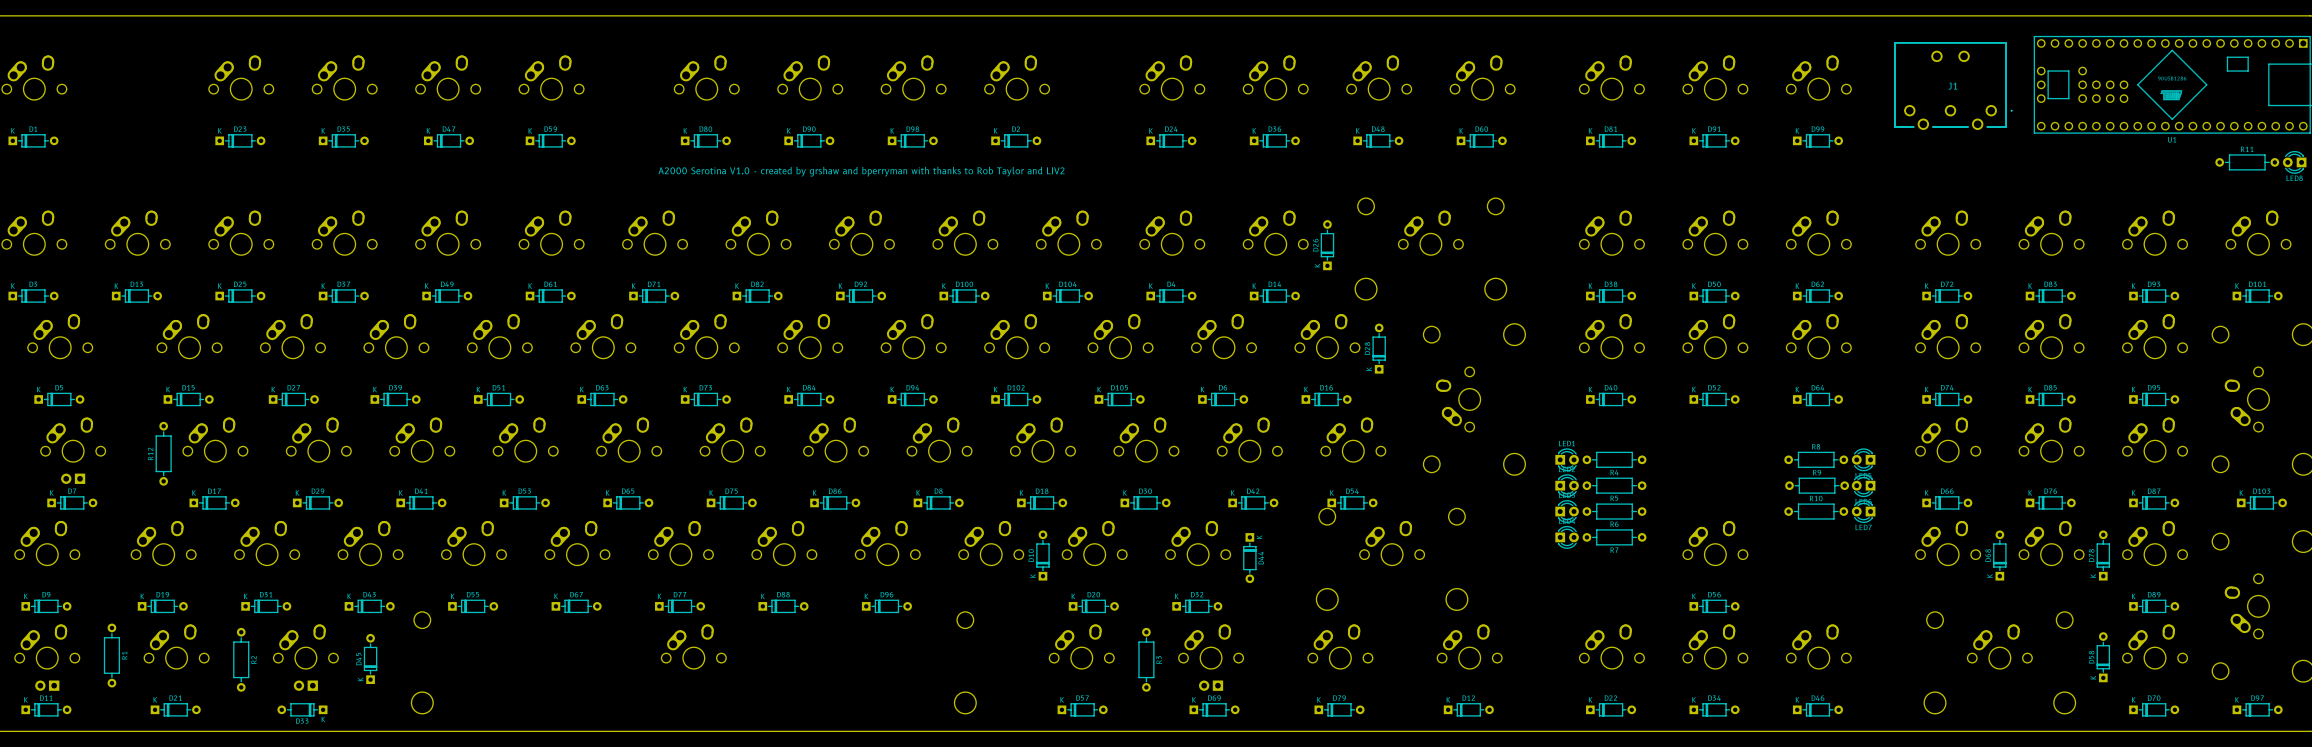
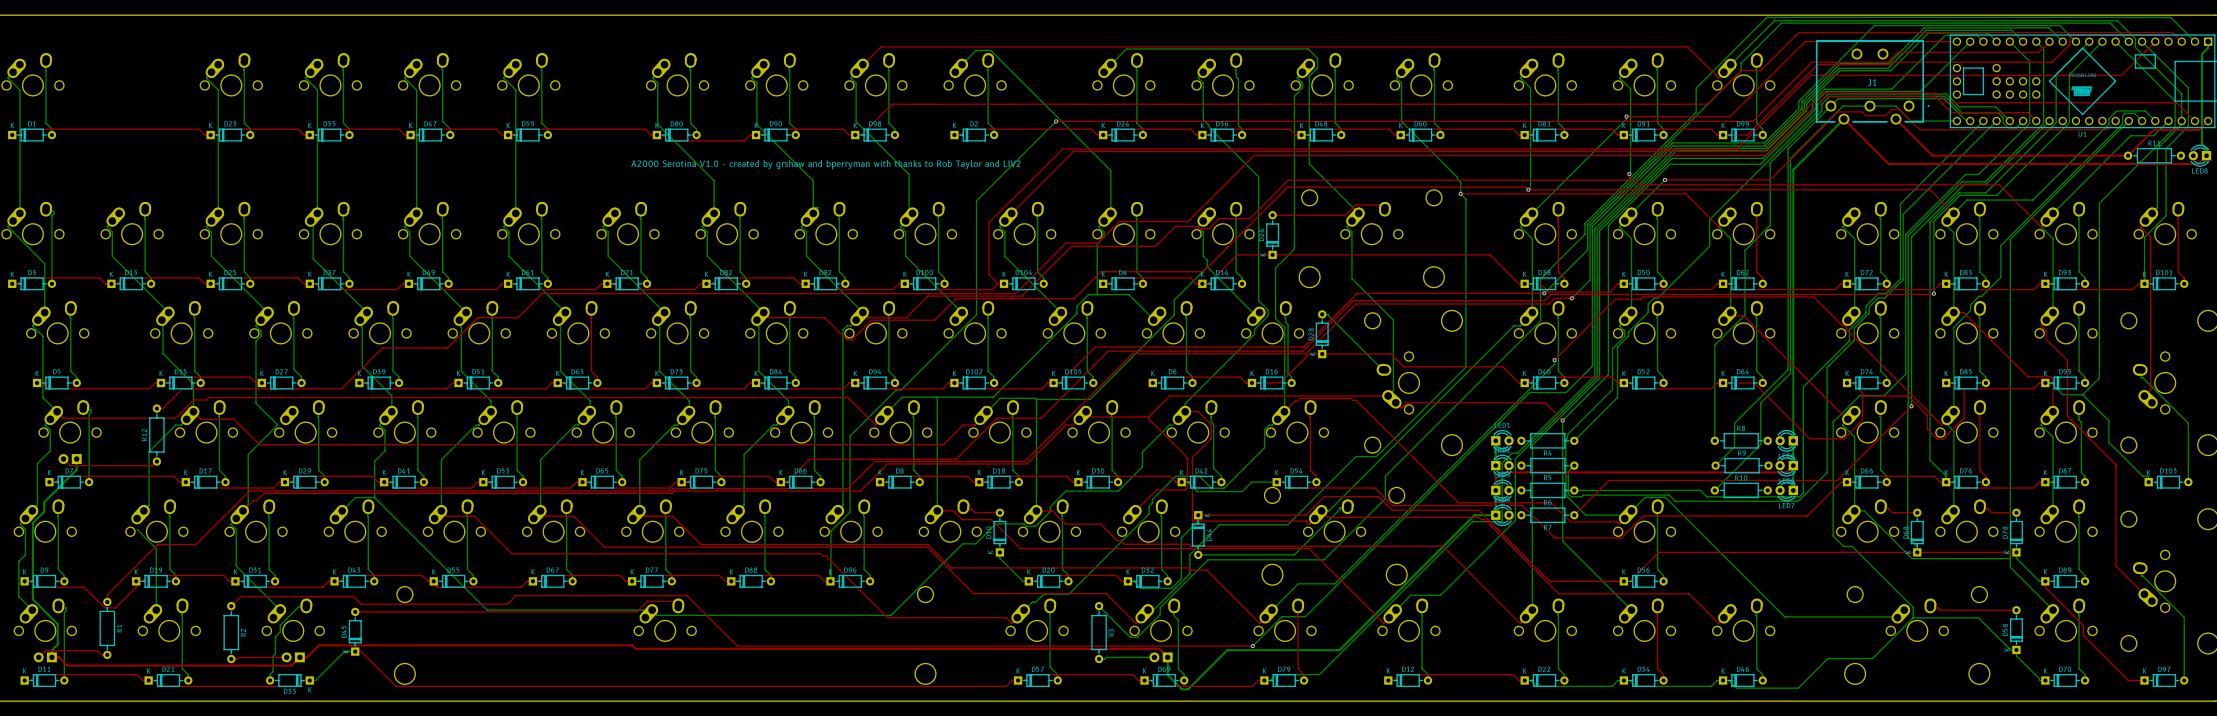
top track: none -> (1956, 41) (1805, 41) (1730, 116) (1626, 116)
bottom track: none -> (1970, 41) (1920, 91) (1826, 91) (1815, 102) (1815, 109) (1760, 164) (1669, 164) (1608, 225) (1608, 374) (1562, 420) (1562, 541) (1631, 610) (1624, 617)
bottom track: none -> (1983, 41) (1977, 35) (1945, 35) (1891, 89) (1824, 89) (1812, 101) (1812, 108) (1762, 158) (1672, 158) (1599, 230) (1599, 378) (1532, 445) (1532, 610) (1525, 617)
bottom track: none -> (1996, 41) (1987, 33) (1928, 33) (1890, 70) (1839, 70) (1806, 103) (1806, 110) (1766, 150) (1676, 150) (1597, 229) (1597, 377) (1515, 458) (1515, 520) (1440, 595) (1410, 595) (1389, 617)
bottom track: none -> (2009, 41) (2029, 61) (2029, 123) (1978, 174) (1965, 174) (1905, 234) (1905, 374) (1884, 395) (1859, 395) (1833, 422) (1833, 535) (1843, 546) (1852, 546) (1913, 607) (1913, 617)
bottom track: none -> (2023, 41) (2011, 30) (1926, 30) (1888, 68) (1838, 68) (1804, 102) (1804, 109) (1765, 148) (1675, 148) (1594, 228) (1594, 376) (1517, 453) (1511, 453) (1502, 462) (1502, 521) (1472, 521) (1319, 674) (1276, 674) (1270, 680) (1264, 680)
bottom track: none -> (2036, 41) (2043, 48) (2043, 123) (1985, 181) (1961, 181) (1908, 235) (1907, 536) (1917, 546) (1917, 552)
top track: none -> (2049, 41) (2038, 52) (1897, 52) (1887, 62) (1812, 62) (1752, 121) (1056, 121)
bottom track: none -> (2062, 41) (2048, 27) (1924, 27) (1888, 63) (1840, 63) (1801, 101) (1801, 108) (1764, 146) (1672, 146) (1592, 226) (1592, 366) (1566, 392) (1529, 392) (1305, 616) (1282, 616) (1252, 646)
bottom track: none -> (2075, 41) (2059, 25) (1874, 25) (1798, 101) (1798, 108) (1764, 142) (1672, 142) (1590, 225) (1590, 280) (1571, 298)
bottom track: none -> (2089, 41) (2056, 74) (2056, 122) (1985, 192) (1959, 192) (1930, 221) (1930, 460) (1946, 476) (1946, 482)
bottom track: none -> (2102, 41) (2069, 74) (2069, 122) (1996, 195) (1960, 195) (1933, 221) (1933, 293)
bottom track: none -> (2115, 41) (2175, 101) (2175, 127) (2099, 203) (2099, 378) (2082, 394)
bottom track: none -> (2128, 41) (2110, 23) (1781, 23) (1741, 63) (1741, 71) (1587, 224) (1587, 249) (1544, 293)
bottom track: none -> (2142, 41) (2188, 87) (2188, 126) (2166, 148) (2166, 215) (2144, 237) (2144, 283)
top track: none -> (2155, 41) (2121, 75) (1810, 75) (1737, 149) (1062, 149) (989, 222) (989, 274) (998, 283) (992, 289) (916, 289) (910, 283) (898, 283) (893, 289) (817, 289) (811, 283) (799, 283) (793, 277) (718, 277) (712, 283) (700, 283) (694, 289) (619, 289) (613, 283) (601, 283) (595, 289) (519, 289) (514, 283) (502, 283) (496, 289) (420, 289) (414, 283) (403, 283) (397, 289) (321, 289) (315, 283) (303, 283) (298, 277) (222, 277) (216, 283) (204, 283) (198, 277) (123, 277) (117, 283) (105, 283) (99, 277) (24, 277) (18, 283) (12, 283)
top track: none -> (2168, 41) (2161, 34) (2070, 34) (2069, 44) (2052, 62) (1892, 62) (1889, 64) (1817, 64) (1747, 135) (1717, 135) (1711, 129) (1635, 129) (1629, 135) (1618, 135) (1612, 129) (1536, 129) (1530, 135) (1518, 135) (1512, 129) (1412, 129) (1406, 135) (1394, 135) (1388, 129) (1313, 129) (1307, 135) (1295, 135) (1289, 129) (1214, 129) (1208, 135) (1196, 135) (1190, 129) (1114, 129) (1109, 135) (1097, 135) (1091, 129) (966, 129) (960, 135) (954, 135)
top track: none -> (2181, 41) (2172, 32) (1798, 32) (1760, 70) (1741, 70) (1707, 104) (891, 104) (861, 135) (849, 135) (843, 129) (767, 129) (761, 135) (750, 135) (744, 140) (668, 140) (662, 135) (651, 135) (645, 129) (519, 129) (514, 135) (502, 135) (496, 129) (422, 129) (416, 135) (404, 135) (398, 129) (321, 129) (315, 135) (303, 135) (298, 129) (222, 129) (216, 135) (204, 135) (198, 129) (24, 129) (18, 135) (12, 135)
bottom track: none -> (2194, 41) (2170, 17) (1766, 17) (1696, 88) (1696, 112) (1584, 223) (1584, 234) (1540, 278) (1540, 321) (1385, 476) (1385, 498) (1324, 559) (1208, 559) (1160, 607) (1160, 614) (1137, 637) (1130, 637) (1099, 606)
bottom track: none -> (2208, 41) (2208, 47) (2201, 54) (2201, 144) (2206, 148) (2206, 155)
bottom track: none -> (46, 59) (45, 123) (51, 129) (51, 135)
bottom track: none -> (244, 59) (244, 123) (250, 129) (250, 135)
bottom track: none -> (343, 59) (343, 123) (349, 129) (349, 135)
bottom track: none -> (442, 59) (442, 121) (450, 129) (450, 135)
bottom track: none -> (542, 59) (541, 123) (547, 129) (547, 135)
bottom track: none -> (690, 59) (690, 123) (696, 129) (696, 135)
bottom track: none -> (789, 59) (789, 123) (795, 129) (795, 135)
bottom track: none -> (889, 59) (888, 123) (894, 129) (894, 135)
bottom track: none -> (988, 59) (988, 123) (994, 129) (994, 135)
bottom track: none -> (1137, 59) (1136, 123) (1142, 129) (1142, 135)
bottom track: none -> (1236, 59) (1235, 69) (1238, 78) (1238, 125) (1242, 129) (1242, 135)
bottom track: none -> (1335, 59) (1335, 123) (1341, 129) (1341, 135)
bottom track: none -> (1434, 59) (1434, 123) (1440, 129) (1440, 135)
bottom track: none -> (1558, 59) (1558, 123) (1564, 129) (1564, 135)
bottom track: none -> (1657, 59) (1657, 123) (1663, 129) (1663, 135)
bottom track: none -> (1756, 59) (1756, 123) (1762, 129) (1762, 135)
bottom track: none -> (19, 64) (7, 77) (19, 89) (19, 213)
bottom track: none -> (218, 64) (206, 77) (218, 89) (218, 213)
bottom track: none -> (317, 64) (305, 77) (317, 89) (317, 216) (313, 220)
bottom track: none -> (416, 64) (404, 77) (416, 89) (416, 213)
bottom track: none -> (515, 64) (503, 77) (515, 89) (515, 213)
bottom track: none -> (1210, 64) (1198, 77) (1203, 83) (1203, 119) (1258, 176) (1258, 300) (1267, 310) (1267, 316) (1254, 329) (1254, 334) (1185, 403) (1185, 411)
bottom track: none -> (1309, 64) (1297, 77) (1302, 83) (1302, 88) (1294, 96) (1294, 249) (1275, 268) (1275, 318) (1284, 327) (1284, 411)
bottom track: none -> (1408, 64) (1396, 77) (1401, 83) (1401, 121) (1457, 177) (1460, 182) (1460, 193) (1465, 199) (1465, 367) (1376, 456) (1356, 456) (1287, 524) (1219, 524) (1189, 554) (1189, 573) (1153, 610) (1148, 610) (1141, 617)
bottom track: none -> (1631, 64) (1619, 77) (1630, 89) (1629, 174)
bottom track: none -> (657, 72) (652, 77) (657, 83) (657, 124) (714, 180) (714, 213) (702, 226) (707, 231) (707, 256) (763, 312) (754, 322) (758, 327) (758, 371) (788, 400) (788, 412) (744, 454) (744, 505)
bottom track: none -> (756, 72) (751, 77) (756, 83) (756, 124) (813, 180) (813, 213)
bottom track: none -> (856, 72) (850, 77) (856, 83) (856, 121) (909, 174) (909, 213)
top track: none -> (856, 72) (881, 46) (1687, 46) (1718, 77) (1723, 72)
bottom track: none -> (955, 72) (976, 50) (990, 50) (1110, 170) (1110, 213)
bottom track: none -> (1104, 72) (1126, 48) (1308, 48) (1317, 58) (1317, 67) (1309, 76) (1309, 163) (1358, 213)
bottom track: none -> (1525, 72) (1520, 77) (1530, 88) (1530, 187) (1528, 189)
bottom track: none -> (1723, 72) (1774, 20) (2117, 20) (2135, 38) (2135, 47) (2181, 93) (2181, 124) (2157, 148) (2157, 207)
bottom track: none -> (1626, 116) (1626, 119) (1520, 226) (1532, 238) (1532, 313) (1520, 325) (1513, 325) (1328, 510) (1321, 510)
via: none -> (1626, 116)
bottom track: none -> (1843, 119) (1793, 169) (1793, 490)
top track: none -> (1843, 119) (1888, 163) (2198, 163) (2206, 155)
top track: none -> (1896, 119) (1932, 155) (2128, 155) (2153, 129) (2199, 129) (2208, 120)
bottom track: none -> (1056, 121) (976, 200) (976, 314) (901, 389) (896, 389) (850, 436) (850, 512) (830, 531) (830, 581)
via: none -> (1056, 121)
bottom track: none -> (1956, 120) (1910, 120) (1896, 106) (1842, 106) (1790, 158) (1790, 373) (1760, 403) (1760, 444) (1714, 490)
bottom track: none -> (1970, 120) (1966, 120) (1944, 98) (1838, 98) (1788, 148) (1788, 369) (1734, 423) (1734, 446) (1715, 465)
bottom track: none -> (1983, 120) (1900, 203) (1900, 279) (1886, 293) (1878, 293) (1865, 306) (1865, 313) (1849, 329) (1849, 340) (1803, 386) (1803, 492) (1799, 496) (1706, 496) (1700, 490) (1574, 490)
bottom track: none -> (1996, 120) (1903, 214) (1903, 279) (1884, 297) (1878, 297) (1869, 306) (1869, 313) (1854, 328) (1854, 340) (1827, 367) (1827, 472) (1798, 501) (1675, 501) (1669, 495) (1571, 496) (1568, 493) (1568, 471) (1574, 465)
bottom track: none -> (2009, 120) (1995, 106) (1958, 106) (1946, 93) (1828, 93) (1817, 104) (1817, 111) (1709, 219) (1709, 246) (1658, 297) (1654, 297) (1648, 303) (1648, 312) (1628, 332) (1628, 335) (1617, 346) (1617, 397) (1574, 440)
bottom track: none -> (2023, 120) (2016, 127) (2008, 127) (1998, 112) (1961, 112) (1945, 96) (1829, 96) (1821, 104) (1821, 111) (1770, 162) (1770, 225) (1744, 250) (1744, 315) (1714, 345) (1714, 440)
top track: none -> (2036, 120) (2027, 112) (1951, 112) (1935, 96) (1825, 96) (1766, 155) (1254, 155) (1187, 221) (1119, 221) (1097, 243) (1066, 243) (1015, 293) (542, 293) (518, 317) (477, 317) (447, 348) (382, 348) (341, 388) (182, 388) (162, 408) (156, 408)
bottom track: none -> (2049, 120) (1986, 184) (1964, 184) (1911, 237) (1911, 406)
top track: none -> (2115, 120) (2106, 129) (1919, 129) (1899, 109) (1891, 109) (1885, 115) (1865, 115) (1862, 111) (1838, 111) (1770, 179) (1665, 179)
bottom track: none -> (2128, 120) (2010, 239) (2010, 567) (2053, 610) (2046, 617)
bottom track: none -> (2142, 120) (2134, 113) (2124, 113) (2122, 115) (2122, 123) (2000, 245) (2000, 277) (1970, 304) (1970, 310) (1953, 327) (1953, 411) (1944, 421) (1953, 431) (1953, 511) (1947, 518)
bottom track: none -> (2155, 120) (2145, 110) (2116, 110) (2109, 118) (2109, 123) (2032, 200) (1967, 200) (1944, 223) (1953, 232) (1953, 313) (1947, 320)
bottom track: none -> (2168, 120) (2153, 135) (2130, 135) (2041, 226) (2053, 238) (2053, 313) (2046, 320)
top track: none -> (2194, 120) (2176, 102) (1947, 102) (1937, 93) (1822, 93) (1764, 151) (1073, 151) (1004, 220)
top track: none -> (1629, 174) (1629, 180)
via: none -> (1629, 174)
bottom track: none -> (1665, 179) (1619, 226) (1631, 238) (1631, 312)
via: none -> (1665, 179)
via: none -> (1528, 189)
top track: none -> (1460, 193) (1685, 193) (1718, 226) (1723, 220)
via: none -> (1460, 193)
bottom track: none -> (46, 207) (45, 210) (53, 211) (51, 215) (51, 283)
bottom track: none -> (145, 207) (145, 271) (151, 277) (151, 283)
bottom track: none -> (244, 207) (244, 271) (250, 277) (250, 283)
bottom track: none -> (343, 207) (343, 271) (349, 277) (349, 283)
bottom track: none -> (442, 207) (442, 271) (448, 277) (448, 283)
bottom track: none -> (542, 207) (541, 271) (547, 277) (547, 283)
bottom track: none -> (641, 207) (641, 271) (646, 277) (646, 283)
bottom track: none -> (740, 207) (740, 271) (746, 277) (746, 283)
bottom track: none -> (813, 207) (818, 207) (801, 226) (806, 231) (806, 256) (862, 312) (850, 325) (846, 325) (842, 329) (843, 505)
bottom track: none -> (839, 207) (839, 271) (845, 277) (845, 283)
bottom track: none -> (938, 207) (938, 271) (944, 277) (944, 283)
bottom track: none -> (1037, 207) (1037, 271) (1043, 277) (1043, 283)
bottom track: none -> (1137, 207) (1136, 271) (1142, 277) (1142, 283)
bottom track: none -> (1236, 207) (1236, 271) (1242, 277) (1242, 283)
bottom track: none -> (1657, 207) (1657, 271) (1663, 277) (1663, 283)
top track: none -> (1756, 207) (1756, 271) (1762, 277) (1762, 283)
bottom track: none -> (1880, 207) (1880, 271) (1886, 277) (1886, 283)
bottom track: none -> (1980, 207) (1979, 271) (1985, 277) (1985, 283)
bottom track: none -> (2079, 207) (2079, 271) (2085, 277) (2085, 283)
top track: none -> (2178, 207) (2178, 271) (2184, 277) (2184, 283)
top track: none -> (1384, 210) (1382, 204) (1355, 204) (1345, 215) (1272, 215)
top track: none -> (1558, 210) (1558, 271) (1564, 277) (1564, 283)
bottom track: none -> (614, 213) (602, 226) (608, 231) (608, 256) (664, 312) (655, 322) (659, 327) (659, 371) (689, 400) (689, 411) (677, 425)
bottom track: none -> (909, 213) (900, 226) (905, 231) (905, 256) (962, 312) (955, 320)
bottom track: none -> (1730, 213) (1718, 226) (1730, 238) (1730, 312)
bottom track: none -> (1854, 213) (1842, 226) (1854, 238) (1854, 312)
top track: none -> (1953, 213) (1930, 189) (1528, 189) (1525, 187) (1287, 187) (1203, 271) (1101, 271) (1074, 298) (956, 298) (934, 320) (871, 320) (852, 339) (846, 339) (824, 317) (768, 317) (763, 312)
bottom track: none -> (13, 220) (7, 226) (44, 263) (44, 313) (32, 325) (42, 336) (42, 397) (57, 412) (45, 425) (50, 430) (50, 450) (37, 463) (37, 505)
bottom track: none -> (112, 220) (107, 226) (112, 231) (112, 256) (168, 312) (163, 320)
bottom track: none -> (211, 220) (206, 226) (211, 231) (211, 256) (267, 312) (255, 325) (261, 331) (261, 336) (255, 341) (255, 403) (277, 425) (248, 454) (248, 505)
bottom track: none -> (313, 220) (313, 258) (367, 312) (357, 322) (362, 327) (362, 366) (391, 395) (391, 412) (379, 425) (385, 430) (385, 450) (374, 461) (374, 497)
bottom track: none -> (409, 220) (404, 226) (409, 231) (409, 256) (466, 312) (457, 322) (461, 327) (461, 371) (491, 400) (491, 412) (479, 425)
bottom track: none -> (508, 220) (503, 226) (508, 231) (508, 256) (565, 312) (556, 322) (560, 327) (560, 371) (590, 400) (590, 412) (578, 425)
bottom track: none -> (1004, 220) (999, 226) (1004, 231) (1004, 256) (1061, 312) (1054, 320)
bottom track: none -> (1104, 220) (1098, 226) (1104, 231) (1104, 236) (1097, 243) (1097, 294)
bottom track: none -> (1203, 220) (1198, 226) (1203, 231) (1203, 256) (1207, 260) (1207, 267)
bottom track: none -> (1351, 220) (1346, 226) (1351, 231) (1351, 278) (1393, 320) (1393, 390) (1388, 395)
top track: none -> (2046, 220) (2041, 226) (1999, 184) (1640, 184) (1635, 180) (1288, 180) (1249, 218) (1219, 218) (1209, 228) (1175, 226) (1155, 246) (1071, 246) (1021, 296) (928, 296) (906, 317) (868, 317) (862, 312)
top track: none -> (2145, 220) (2140, 226) (2150, 237) (2150, 389) (2144, 395)
bottom track: none -> (1207, 267) (1252, 312)
bottom track: none -> (1207, 267) (1174, 300) (1174, 314) (1089, 399) (1036, 399)
top track: none -> (1103, 283) (1109, 283) (1114, 277) (1190, 277) (1196, 283) (1208, 283) (1237, 254) (1489, 254) (1518, 283) (1540, 283) (1548, 292) (1609, 292) (1618, 283) (1629, 283) (1635, 289) (1711, 289) (1717, 283) (1728, 283) (1734, 289) (1835, 289) (1841, 283) (1852, 283) (1858, 289) (1934, 289) (1940, 283) (1952, 283) (1957, 289) (2033, 289) (2039, 283) (2051, 283) (2057, 289) (2132, 289) (2138, 283) (2144, 283)
top track: none -> (1544, 293) (1357, 293) (1303, 346) (1095, 346) (1059, 382) (1047, 382) (1041, 388) (966, 388) (960, 382) (948, 382) (942, 388) (867, 388) (861, 382) (849, 382) (843, 388) (767, 388) (761, 382) (750, 382) (744, 388) (668, 388) (662, 382) (651, 382) (645, 388) (569, 388) (563, 382) (551, 382) (545, 388) (470, 388) (464, 382) (452, 382) (446, 388) (371, 388) (365, 382) (359, 382)
via: none -> (1544, 293)
top track: none -> (1933, 293) (1550, 294) (1544, 300) (1353, 300) (1302, 351) (1108, 351) (1041, 418) (997, 418) (956, 459) (809, 459) (786, 482) (775, 482) (769, 476) (693, 476) (687, 482) (675, 482) (669, 488) (594, 488) (588, 482) (576, 482) (570, 488) (495, 488) (489, 482) (477, 482) (471, 488) (395, 488) (390, 482) (378, 482) (372, 476) (296, 476) (290, 482) (279, 482) (273, 488) (197, 488) (191, 482) (179, 482) (174, 476) (61, 476) (55, 482) (49, 482)
via: none -> (1933, 293)
top track: none -> (1571, 298) (1554, 298) (1549, 303) (1355, 303) (1306, 353) (1132, 353) (1024, 461) (874, 461) (847, 488) (672, 488) (670, 490) (249, 490) (195, 544) (157, 544) (107, 595) (107, 601)
via: none -> (1571, 298)
bottom track: none -> (70, 306) (70, 371) (76, 377) (76, 382)
bottom track: none -> (194, 306) (194, 371) (200, 377) (200, 382)
bottom track: none -> (294, 306) (293, 369) (301, 377) (301, 382)
bottom track: none -> (393, 306) (393, 371) (399, 377) (399, 382)
bottom track: none -> (492, 306) (492, 371) (498, 377) (498, 382)
top track: none -> (591, 306) (591, 371) (597, 377) (597, 382)
bottom track: none -> (690, 306) (690, 371) (696, 377) (696, 382)
bottom track: none -> (789, 306) (789, 371) (795, 377) (795, 382)
bottom track: none -> (889, 306) (888, 371) (894, 377) (894, 382)
bottom track: none -> (988, 306) (988, 371) (994, 377) (994, 382)
bottom track: none -> (1087, 306) (1087, 371) (1093, 377) (1093, 382)
bottom track: none -> (1285, 306) (1285, 322) (1288, 324) (1288, 373) (1291, 377) (1291, 382)
bottom track: none -> (1558, 306) (1558, 371) (1564, 377) (1564, 382)
bottom track: none -> (1657, 306) (1657, 371) (1663, 377) (1663, 382)
bottom track: none -> (1756, 306) (1756, 371) (1762, 377) (1762, 382)
bottom track: none -> (1880, 306) (1880, 371) (1886, 377) (1886, 382)
bottom track: none -> (1980, 306) (1979, 371) (1985, 377) (1985, 382)
bottom track: none -> (2079, 306) (2079, 371) (2085, 377) (2085, 382)
bottom track: none -> (1186, 309) (1186, 371) (1192, 377) (1192, 382)
top track: none -> (1953, 312) (1963, 312) (2027, 376) (2050, 376) (2053, 378) (2053, 411)
bottom track: none -> (1322, 314) (1328, 314) (1382, 369)
bottom track: none -> (163, 320) (163, 353) (193, 384) (193, 411) (181, 425) (175, 425) (149, 451) (149, 505) (143, 510)
bottom track: none -> (1153, 319) (1128, 294) (1088, 294) (1076, 306) (1076, 313) (993, 397) (902, 397) (880, 419)
bottom track: none -> (1624, 320) (1619, 325) (1624, 331) (1624, 336) (1612, 348) (1612, 389) (1567, 434) (1565, 439) (1565, 495) (1585, 515) (1627, 515) (1644, 497) (1665, 497) (1784, 616) (1897, 616)
top track: none -> (1723, 320) (1728, 315) (1743, 315) (1847, 418)
top track: none -> (2046, 320) (2041, 325) (2046, 331) (2046, 339) (2067, 360) (2067, 416) (2116, 464) (2116, 565) (2138, 589)
top track: none -> (1843, 324) (1846, 329) (1941, 425) (1947, 419)
top track: none -> (1843, 324) (1842, 325) (1813, 296) (1643, 296) (1640, 299) (1615, 299) (1554, 360)
bottom track: none -> (1554, 360) (1554, 364) (1334, 583) (1298, 583) (1265, 617)
via: none -> (1554, 360)
bottom track: none -> (2141, 369) (2141, 377) (2188, 423) (2188, 482)
top track: none -> (37, 382) (42, 382) (48, 388) (149, 388) (155, 382) (166, 382) (172, 377) (250, 377) (255, 382) (261, 382)
top track: none -> (1152, 382) (1158, 382) (1164, 377) (1240, 377) (1246, 382) (1280, 382) (1309, 354) (1391, 354) (1403, 366) (1502, 366) (1518, 382) (1530, 382) (1536, 377) (1612, 377) (1618, 382) (1629, 382) (1635, 388) (1711, 388) (1717, 382) (1754, 382) (1809, 438) (1844, 438) (1862, 420) (1862, 392) (1852, 382) (1847, 382)
top track: none -> (1946, 382) (1952, 382) (1957, 388) (2033, 388) (2039, 382) (2045, 382)
bottom track: none -> (2045, 382) (2051, 382) (2062, 394) (2082, 394)
top track: none -> (1964, 388) (1964, 418) (1943, 439) (1937, 439) (1927, 429) (1927, 415) (1908, 396) (1862, 396)
bottom track: none -> (2082, 394) (2108, 420) (2108, 442) (2142, 476) (2148, 476) (2148, 482)
top track: none -> (1388, 395) (1169, 395) (1148, 417)
bottom track: none -> (937, 397) (937, 510)
bottom track: none -> (1036, 399) (1036, 510) (1029, 518)
bottom track: none -> (1036, 399) (1000, 398) (980, 419)
top track: none -> (1395, 402) (1401, 407) (1406, 402) (1545, 402) (1562, 420)
bottom track: none -> (83, 406) (83, 409) (91, 409) (89, 414) (89, 482)
bottom track: none -> (219, 406) (219, 470) (225, 476) (225, 482)
bottom track: none -> (318, 406) (318, 470) (324, 476) (324, 482)
bottom track: none -> (418, 406) (417, 470) (423, 476) (423, 482)
bottom track: none -> (517, 406) (517, 470) (523, 476) (523, 482)
bottom track: none -> (616, 406) (616, 470) (622, 476) (622, 482)
bottom track: none -> (715, 406) (715, 470) (721, 476) (721, 482)
bottom track: none -> (814, 406) (814, 470) (820, 476) (820, 482)
bottom track: none -> (913, 406) (913, 470) (919, 476) (919, 482)
bottom track: none -> (1013, 406) (1012, 470) (1018, 476) (1018, 482)
bottom track: none -> (1112, 406) (1112, 470) (1118, 476) (1118, 482)
bottom track: none -> (1211, 406) (1211, 422) (1213, 424) (1213, 468) (1221, 476) (1221, 482)
bottom track: none -> (1880, 406) (1880, 470) (1886, 476) (1886, 482)
top track: none -> (1911, 406) (1837, 480) (1609, 480) (1574, 515)
via: none -> (1911, 406)
bottom track: none -> (2079, 406) (2078, 416) (2081, 422) (2081, 472) (2085, 476) (2085, 482)
top track: none -> (1310, 409) (1310, 470) (1316, 476) (1316, 482)
top track: none -> (1979, 409) (1979, 470) (1985, 476) (1985, 482)
top track: none -> (57, 411) (63, 418) (175, 418) (193, 399) (206, 399) (208, 397) (848, 397) (875, 425) (880, 419)
top track: none -> (193, 411) (200, 419) (234, 419) (259, 444) (943, 444) (963, 425) (974, 425) (980, 419)
top track: none -> (1086, 411) (1091, 417) (1148, 417)
bottom track: none -> (2053, 411) (2041, 425) (2053, 437) (2053, 511) (2046, 518)
top track: none -> (1184, 412) (1198, 411) (1211, 424) (1211, 438) (1192, 457) (1192, 521) (1306, 521) (1309, 524) (1321, 511)
top track: none -> (1283, 412) (1300, 398) (1350, 398) (1356, 400) (1458, 502) (1551, 502) (1570, 522) (1617, 522) (1619, 524) (1624, 518)
top track: none -> (1148, 417) (1187, 457) (1187, 487) (1185, 490) (1156, 490) (1135, 510)
bottom track: none -> (1277, 419) (1264, 430) (1264, 447) (1224, 488) (1211, 488) (1199, 476) (1175, 476) (1152, 499) (1152, 502) (1149, 506) (1149, 514) (1068, 594) (1044, 594) (1035, 602) (1032, 602) (1017, 617)
bottom track: none -> (1847, 419) (1842, 425) (1854, 437) (1854, 510) (1864, 510) (1912, 558) (2010, 558)
via: none -> (1562, 420)
bottom track: none -> (479, 425) (476, 425) (441, 459) (441, 510)
bottom track: none -> (578, 425) (575, 425) (540, 459) (540, 510)
bottom track: none -> (677, 425) (674, 425) (639, 459) (639, 510)
top track: none -> (1074, 425) (1065, 425) (1027, 463) (887, 463) (860, 490) (674, 490) (672, 493) (263, 493) (243, 510)
bottom track: none -> (1173, 425) (1169, 425) (1142, 452) (1142, 466) (1118, 491) (1066, 491) (1050, 506) (1050, 511) (1035, 526) (1026, 526) (1024, 523) (995, 523) (975, 543) (962, 543) (891, 615) (656, 615) (652, 610)
bottom track: none -> (1495, 440) (1495, 465)
top track: none -> (63, 459) (70, 465) (152, 465) (156, 461)
bottom track: none -> (76, 459) (76, 469) (44, 502) (44, 511) (32, 523) (32, 599) (57, 624) (57, 644) (51, 650) (51, 657)
top track: none -> (1793, 465) (1786, 472) (1502, 472) (1495, 479) (1495, 490)
top track: none -> (880, 482) (885, 482) (891, 476) (967, 476) (973, 482) (985, 482) (990, 476) (1066, 476) (1072, 482) (1084, 482) (1090, 476) (1169, 476) (1175, 482) (1181, 482)
bottom track: none -> (1181, 482) (1187, 482) (1197, 491) (1242, 491) (1251, 482) (1276, 482)
top track: none -> (1276, 482) (1282, 482) (1288, 488) (1375, 488) (1392, 505) (1522, 505) (1555, 538) (1621, 538) (1643, 516) (1807, 516) (1841, 482) (1852, 482) (1858, 476) (1934, 476) (1940, 482) (1952, 482) (1957, 488) (2033, 488) (2039, 482) (2045, 482)
bottom track: none -> (1495, 490) (1495, 515) (1474, 515) (1339, 650) (1227, 650) (1188, 689) (1181, 689) (1167, 675) (1167, 657)
bottom track: none -> (374, 497) (355, 497) (335, 518)
bottom track: none -> (374, 497) (487, 610) (652, 610)
bottom track: none -> (37, 505) (20, 524) (25, 529) (25, 554) (18, 561) (18, 596) (32, 610) (25, 617)
bottom track: none -> (248, 505) (231, 524) (236, 529) (236, 566) (280, 610) (273, 617)
bottom track: none -> (58, 505) (58, 569) (64, 575) (64, 581)
bottom track: none -> (170, 505) (169, 569) (175, 575) (175, 581)
bottom track: none -> (368, 505) (368, 569) (374, 575) (374, 581)
bottom track: none -> (467, 505) (467, 569) (473, 575) (473, 581)
bottom track: none -> (566, 505) (566, 569) (572, 575) (572, 581)
bottom track: none -> (666, 505) (665, 569) (671, 575) (671, 581)
bottom track: none -> (765, 505) (764, 569) (770, 575) (770, 581)
bottom track: none -> (864, 505) (864, 569) (870, 575) (870, 581)
bottom track: none -> (1062, 505) (1062, 569) (1068, 575) (1068, 581)
bottom track: none -> (1161, 505) (1161, 569) (1167, 575) (1167, 581)
bottom track: none -> (1347, 505) (1347, 508) (1339, 507) (1294, 554) (1198, 554)
bottom track: none -> (1657, 505) (1657, 569) (1663, 575) (1663, 581)
bottom track: none -> (2079, 505) (2079, 569) (2085, 575) (2085, 581)
bottom track: none -> (269, 508) (269, 569) (275, 575) (275, 581)
top track: none -> (963, 508) (971, 508) (975, 512) (999, 512)
top track: none -> (1880, 508) (1888, 508) (1892, 512) (1917, 512)
top track: none -> (1979, 508) (1987, 508) (1991, 512) (2016, 512)
top track: none -> (1036, 510) (1052, 510) (1065, 524) (1100, 524) (1117, 540) (1120, 540) (1124, 544) (1189, 544) (1191, 546) (1443, 546) (1520, 623) (1525, 617)
top track: none -> (440, 511) (446, 516) (474, 516) (511, 553) (820, 553) (825, 555) (887, 617) (1006, 617) (1012, 623) (1017, 617)
top track: none -> (1321, 511) (1327, 517) (1479, 517) (1484, 519) (1558, 593) (1689, 593) (1718, 623) (1723, 617)
bottom track: none -> (1198, 515) (1198, 521) (1181, 537) (1181, 578) (1171, 588) (1140, 588) (1133, 581) (1128, 581)
top track: none -> (1198, 515) (1305, 515) (1324, 496) (1378, 496) (1392, 510) (1478, 510) (1549, 581) (1629, 581) (1658, 552) (2016, 552)
top track: none -> (533, 518) (540, 510) (545, 516) (573, 516) (604, 547) (927, 547) (973, 593) (1106, 593) (1136, 623) (1141, 617)
top track: none -> (632, 518) (639, 510) (645, 516) (672, 516) (701, 544) (927, 544) (951, 567) (1189, 567) (1191, 570) (1206, 570) (1260, 623) (1265, 617)
top track: none -> (930, 518) (937, 510) (953, 510) (962, 519) (991, 519) (1020, 548) (1309, 548) (1384, 623) (1389, 617)
bottom track: none -> (137, 529) (156, 548) (156, 610) (149, 617)
bottom track: none -> (999, 552) (999, 558) (1022, 581) (1028, 581)
bottom track: none -> (2016, 552) (2016, 558) (2039, 581) (2045, 581)
bottom track: none -> (2141, 568) (2141, 576) (2184, 617) (2184, 680)
top track: none -> (24, 581) (30, 581) (36, 587) (84, 587) (104, 607) (115, 607) (136, 587) (136, 581) (142, 581) (147, 575) (223, 575) (229, 581) (241, 581) (247, 587) (322, 587) (328, 581) (340, 581) (346, 575) (422, 575) (427, 581) (433, 581)
top track: none -> (430, 581) (436, 587) (521, 587) (527, 581) (538, 581) (544, 575) (620, 575) (626, 581) (637, 581) (643, 575) (719, 575) (725, 581) (737, 581) (743, 575) (818, 575) (824, 581) (830, 581)
top track: none -> (1028, 581) (1034, 581) (1040, 575) (1116, 575) (1122, 581) (1128, 581)
top track: none -> (2045, 581) (2045, 587) (2083, 625) (2083, 635) (2128, 680) (2144, 680)
bottom track: none -> (58, 604) (58, 607) (66, 608) (64, 612) (64, 680)
bottom track: none -> (182, 604) (182, 668) (188, 674) (188, 680)
bottom track: none -> (306, 604) (306, 607) (298, 606) (280, 625) (280, 632) (275, 636) (275, 654) (273, 656) (273, 671) (270, 674) (270, 680)
top track: none -> (678, 604) (674, 601) (647, 601) (636, 611) (355, 611)
bottom track: none -> (1050, 604) (1050, 666) (1057, 674) (1057, 680)
bottom track: none -> (1174, 604) (1173, 615) (1178, 620) (1178, 668) (1184, 674) (1184, 680)
bottom track: none -> (1422, 604) (1422, 668) (1428, 674) (1428, 680)
bottom track: none -> (1558, 604) (1558, 668) (1564, 674) (1564, 680)
top track: none -> (1657, 604) (1657, 668) (1663, 674) (1663, 680)
bottom track: none -> (1756, 604) (1756, 668) (1762, 674) (1762, 680)
bottom track: none -> (2079, 604) (2079, 668) (2085, 674) (2085, 680)
top track: none -> (231, 606) (240, 596) (353, 596) (361, 604) (507, 604) (516, 595) (686, 595) (737, 646) (1252, 646)
top track: none -> (1298, 607) (1298, 668) (1304, 674) (1304, 680)
top track: none -> (1930, 607) (1938, 608) (1940, 610) (2016, 610)
bottom track: none -> (1913, 617) (1872, 658) (1827, 658) (1798, 688) (1736, 688) (1728, 680) (1717, 680) (1711, 686) (1635, 686) (1629, 680) (1618, 680) (1612, 686) (1536, 686) (1530, 680) (1524, 680)
bottom track: none -> (1913, 617) (1978, 617) (2010, 649) (2016, 649) (2016, 655) (2039, 680) (2045, 680)
via: none -> (1252, 646)
bottom track: none -> (355, 651) (344, 651) (315, 680) (309, 680)
top track: none -> (355, 651) (361, 651) (395, 686) (1006, 686) (1012, 680) (1023, 680) (1029, 674) (1132, 674) (1138, 680) (1150, 680) (1156, 686) (1252, 686) (1258, 680) (1264, 680)
top track: none -> (107, 654) (101, 654) (97, 650) (45, 650) (38, 657)
top track: none -> (51, 657) (58, 657) (67, 665) (291, 665) (299, 657) (306, 657) (318, 645) (632, 645) (635, 648) (1159, 648) (1167, 657)
top track: none -> (286, 657) (231, 659)
bottom track: none -> (1154, 657) (1099, 659)
top track: none -> (24, 680) (30, 680) (36, 674) (136, 674) (142, 680) (154, 680) (160, 686) (298, 686) (303, 680) (309, 680)
top track: none -> (1388, 680) (1394, 680) (1400, 674) (1512, 674) (1518, 680) (1524, 680)

